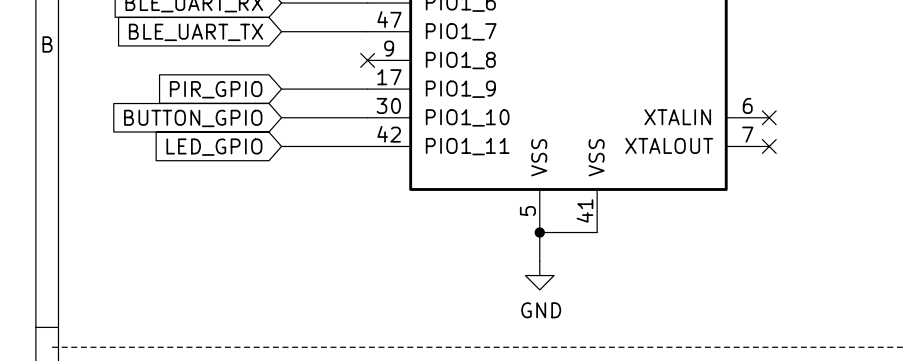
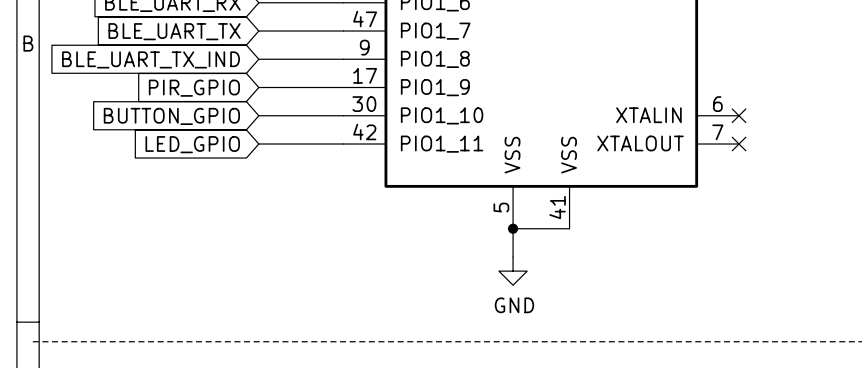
wire: none -> (258, 59) (343, 59)
no-connect mark: (367, 60) -> none
global label: none -> BLE_UART_TX_IND (151, 59)

